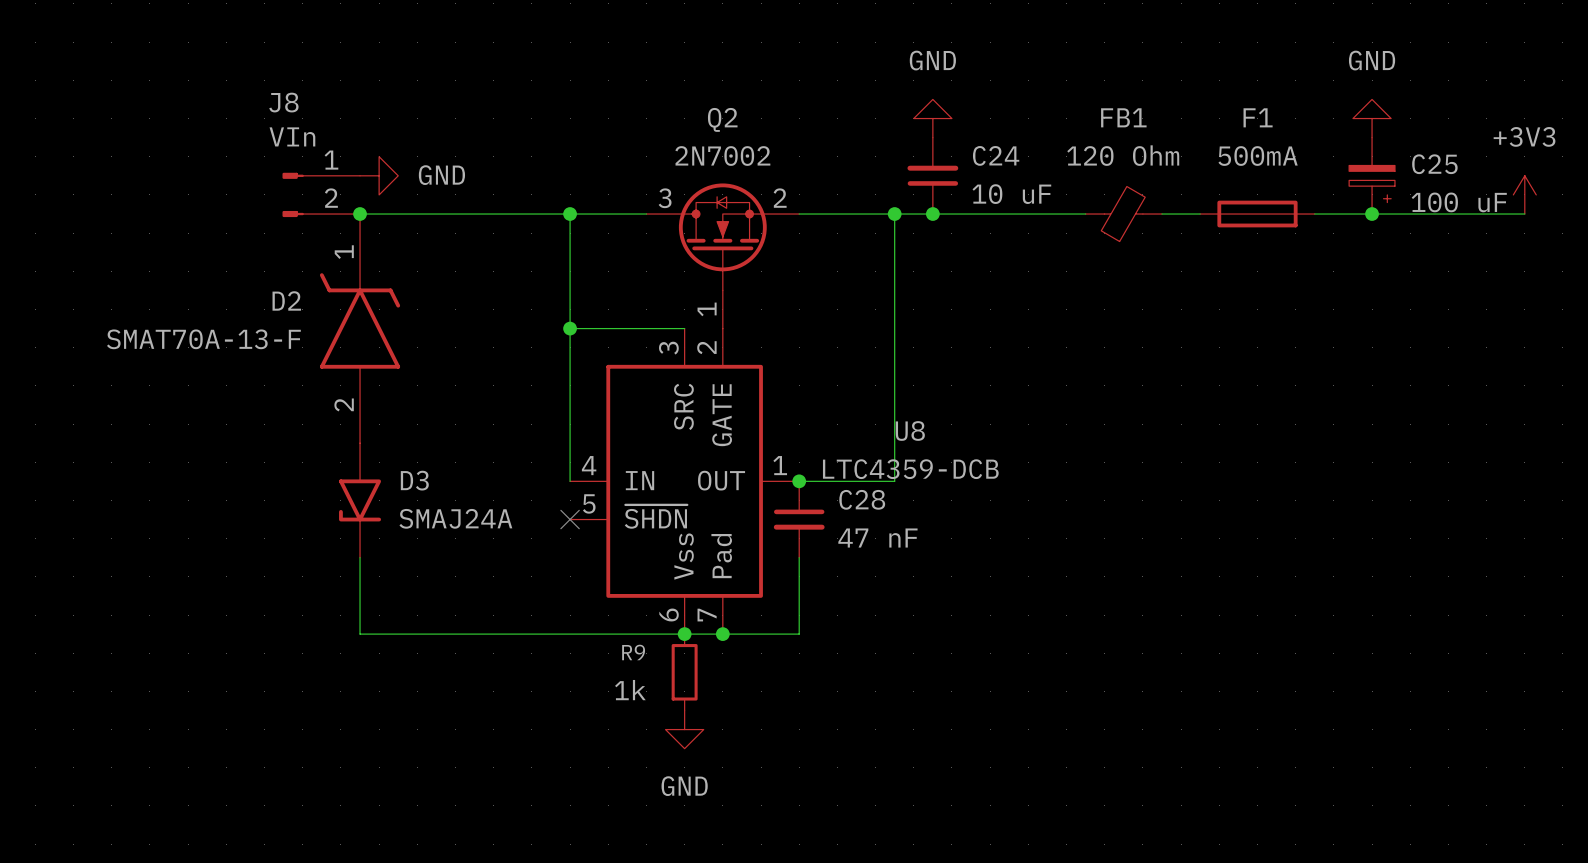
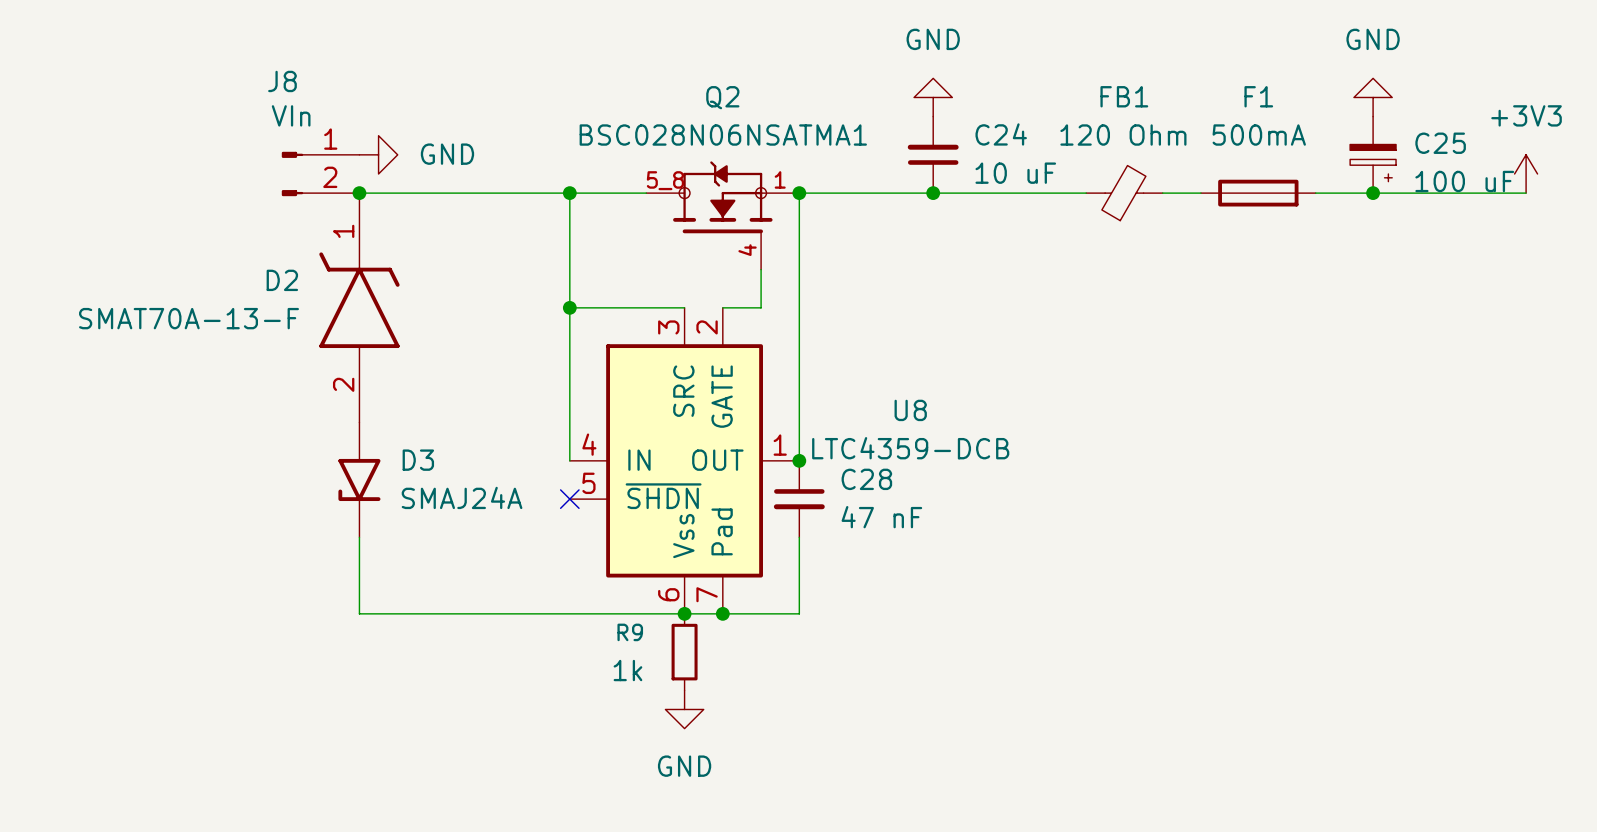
Q2 value: 2N7002 (722, 156) -> BSC028N06NSATMA1 (723, 135)
Q2 symbol: [646, 183, 800, 329] -> [646, 161, 800, 270]
junction: none -> (799, 193)
wire: (894, 214) (894, 481) (799, 481) -> (799, 193) (799, 460)
junction: (894, 214) -> none
wire: none -> (761, 269) (761, 307) (722, 307)

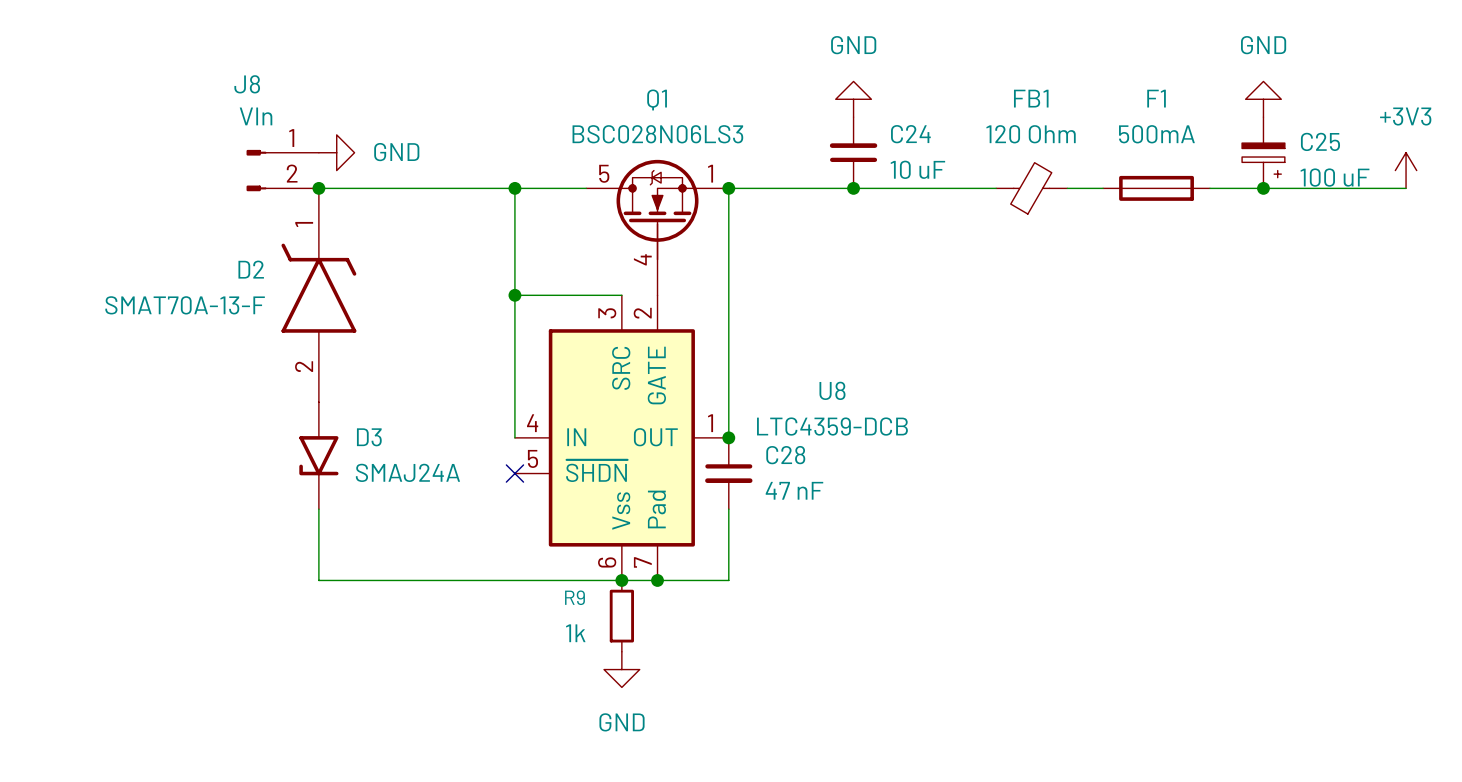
Q2: BSC028N06NSATMA1 (722, 215) -> none
Q1: none -> BSC028N06LS3 (657, 227)
wire: (761, 269) (761, 307) (722, 307) -> none

